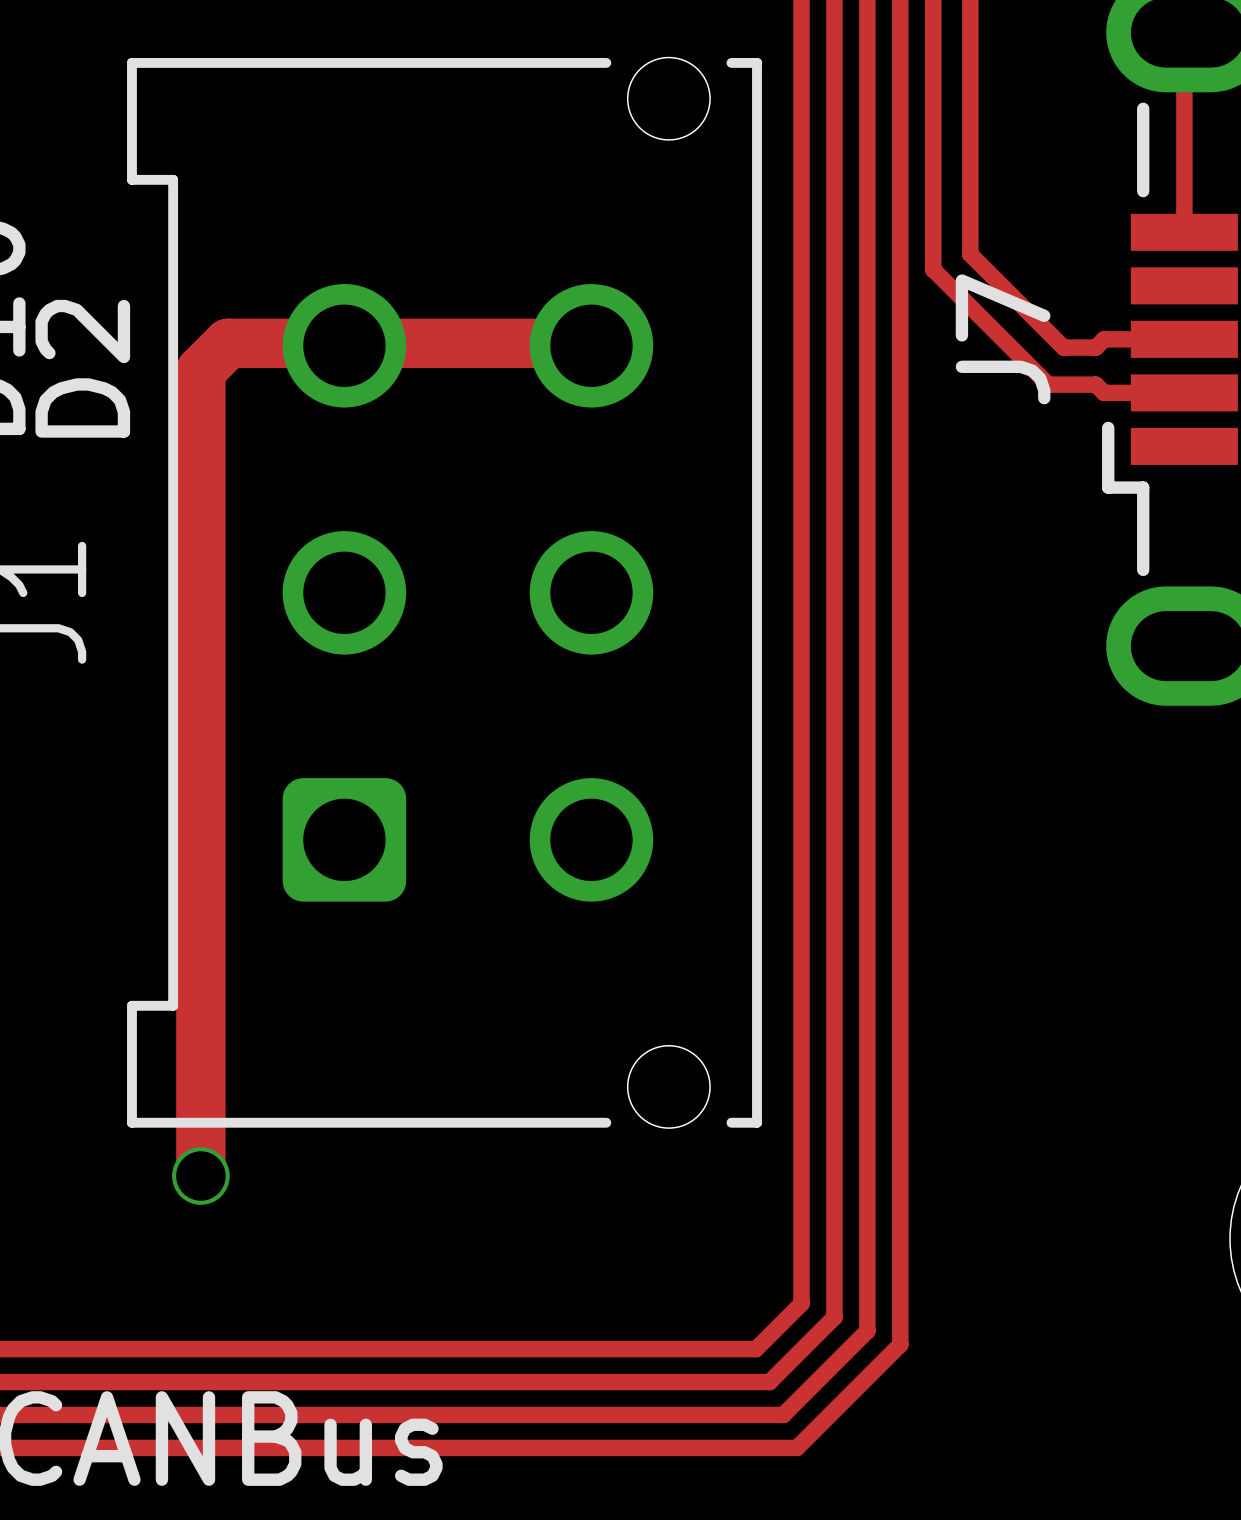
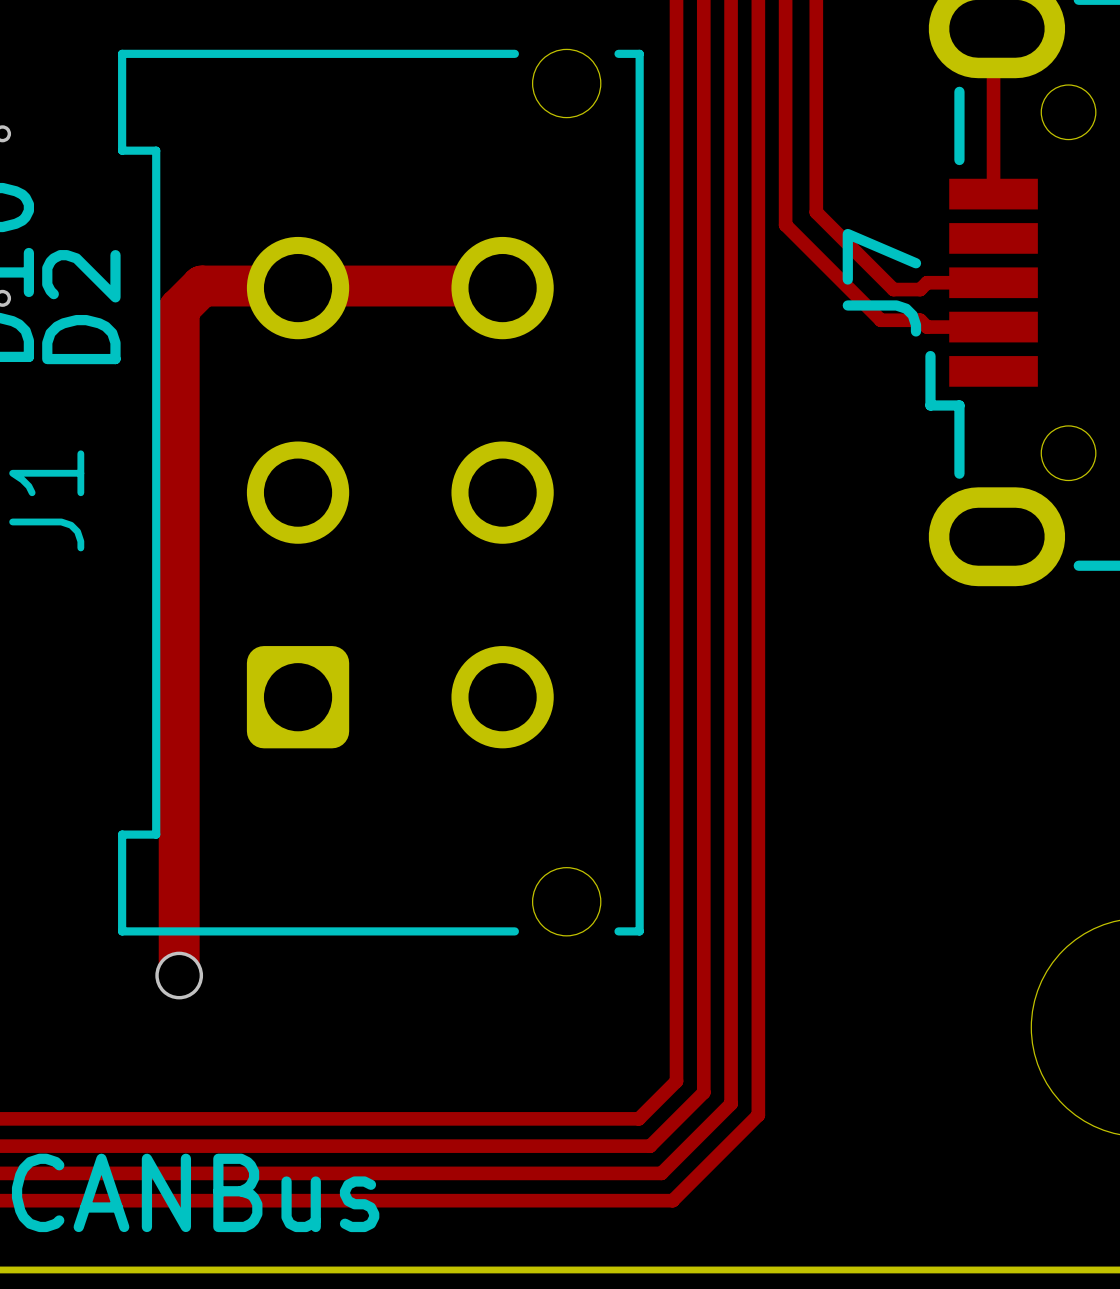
J7 name position: J7 (1003, 339) -> J7 (881, 282)

